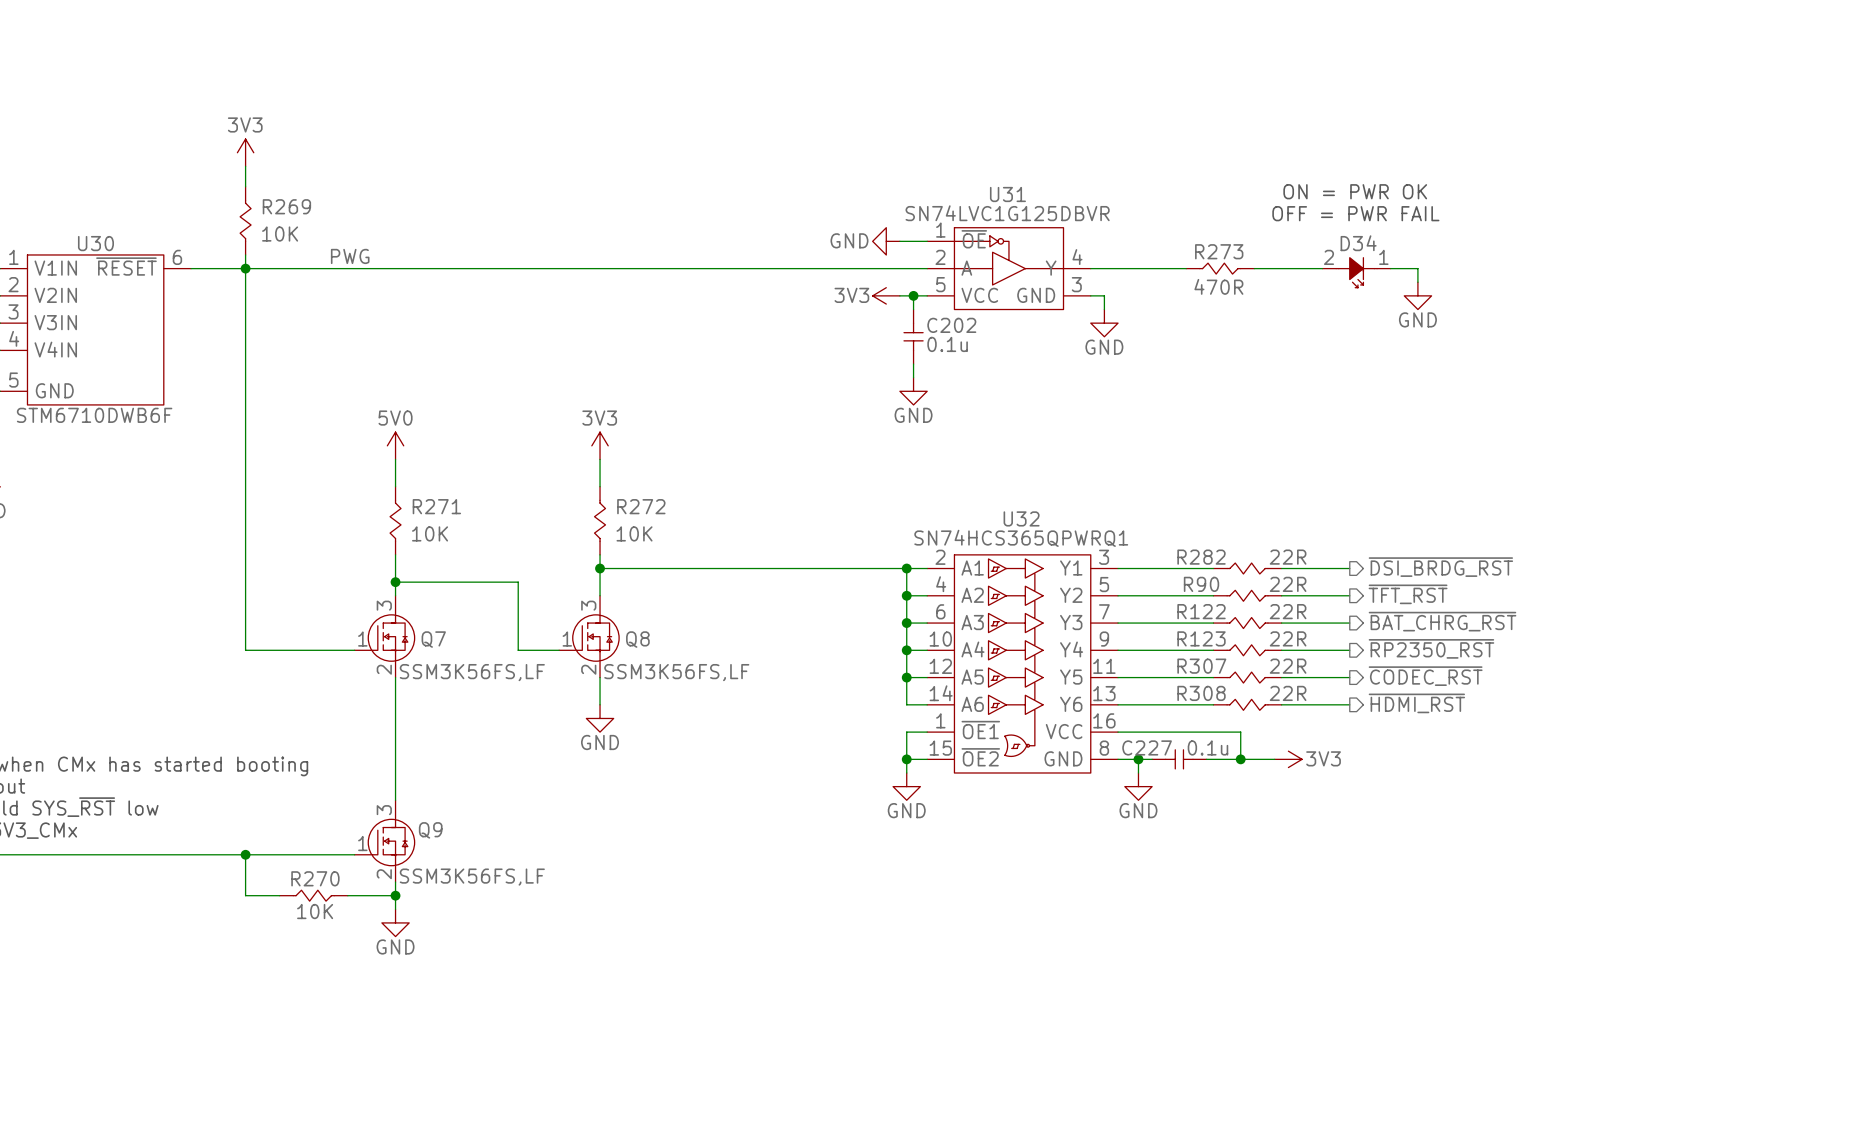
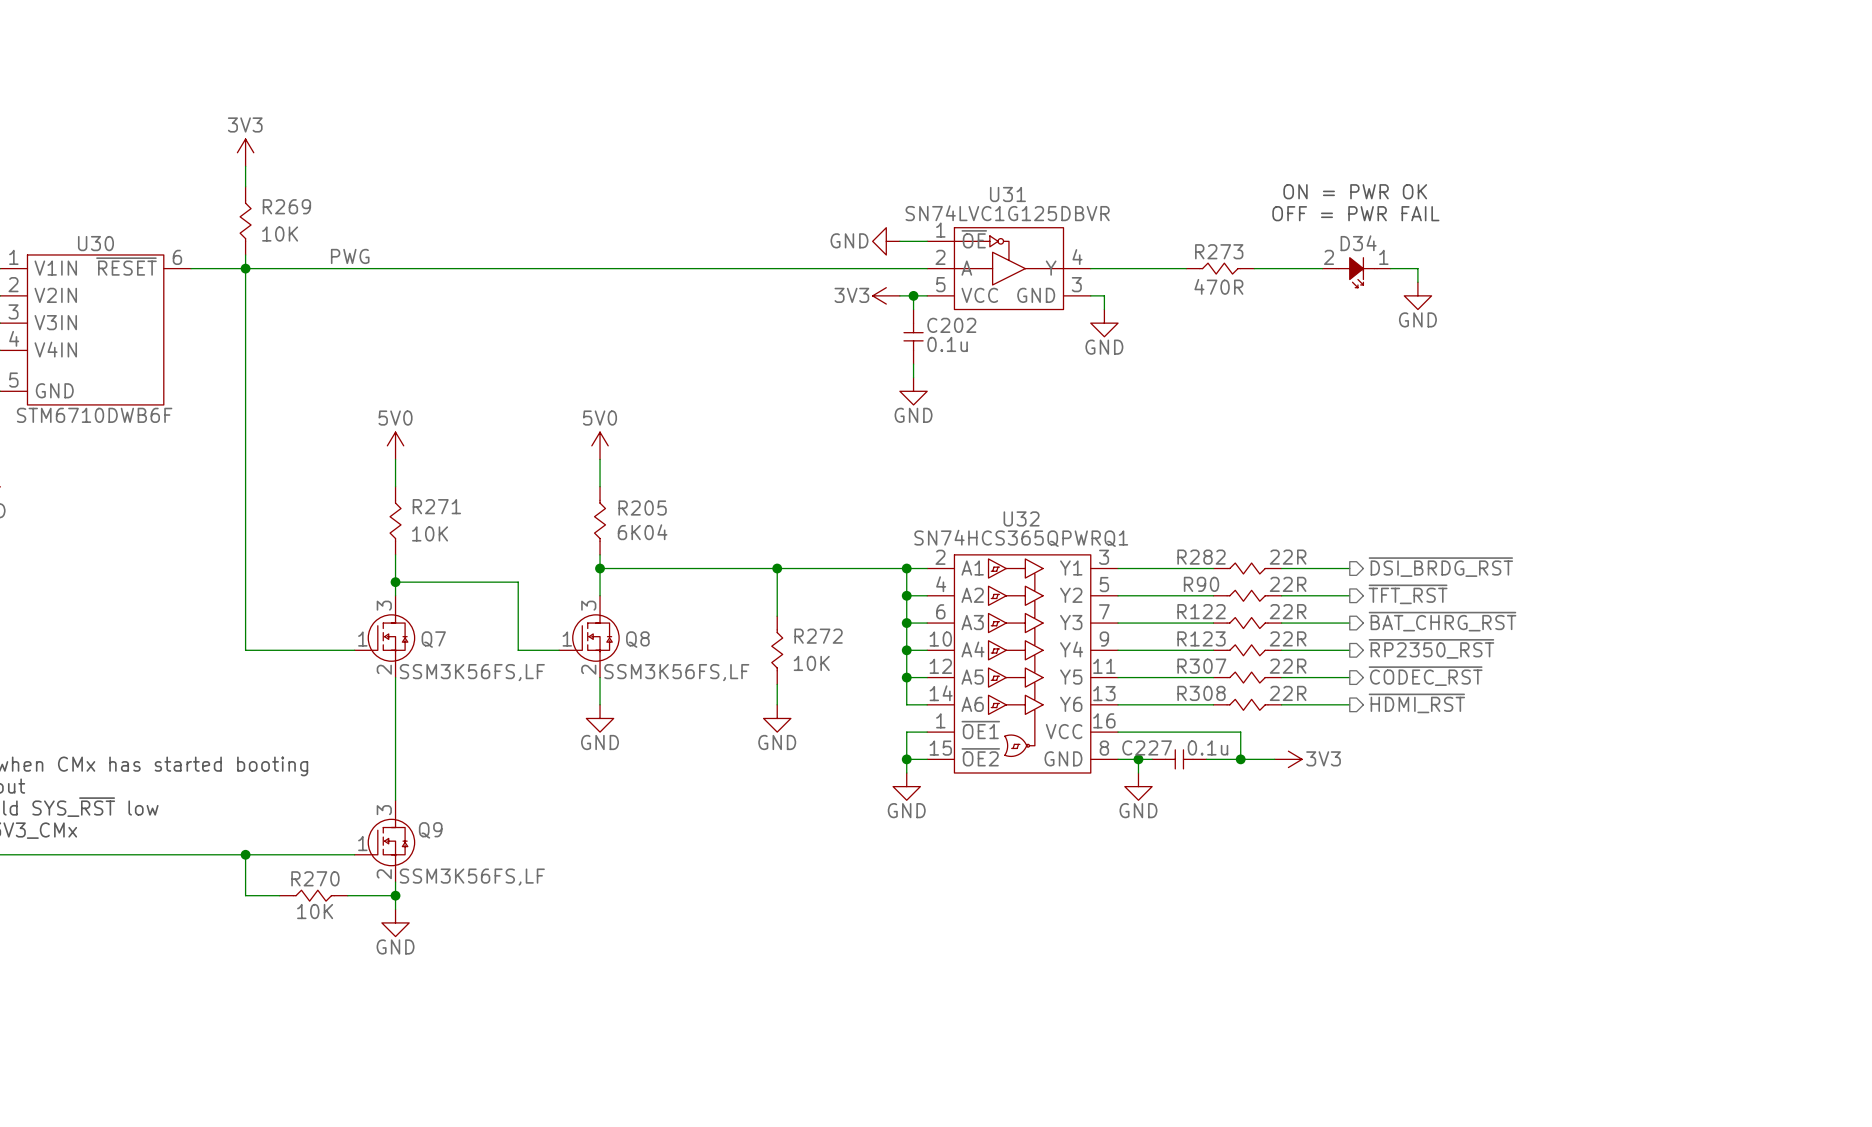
power symbol: 3V3 (600, 445) -> 5V0 (600, 445)
R272 name: R272 (641, 506) -> R205 (642, 508)
R272 value: 10K (634, 533) -> 6K04 (642, 532)
wire: none -> (777, 568) (777, 616)
junction: none -> (777, 568)
R272: none -> 10K (777, 650)
wire: none -> (777, 684) (777, 704)
power symbol: none -> GND (777, 718)

